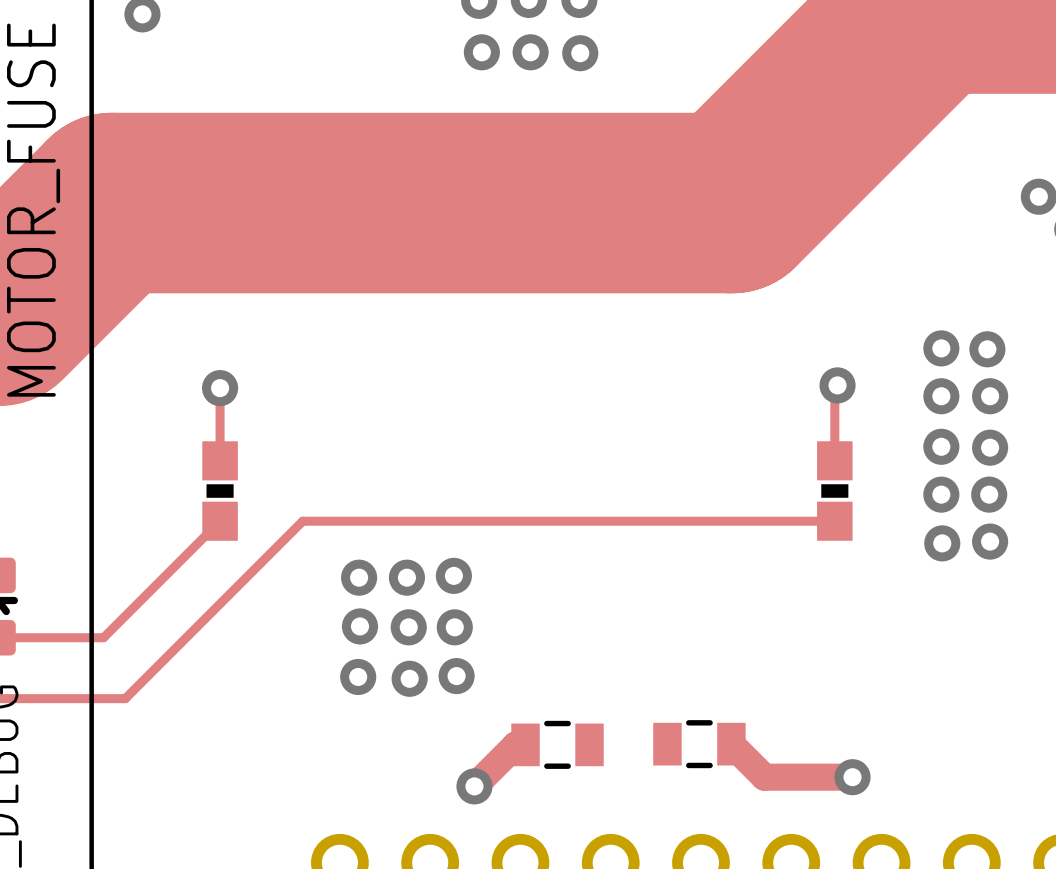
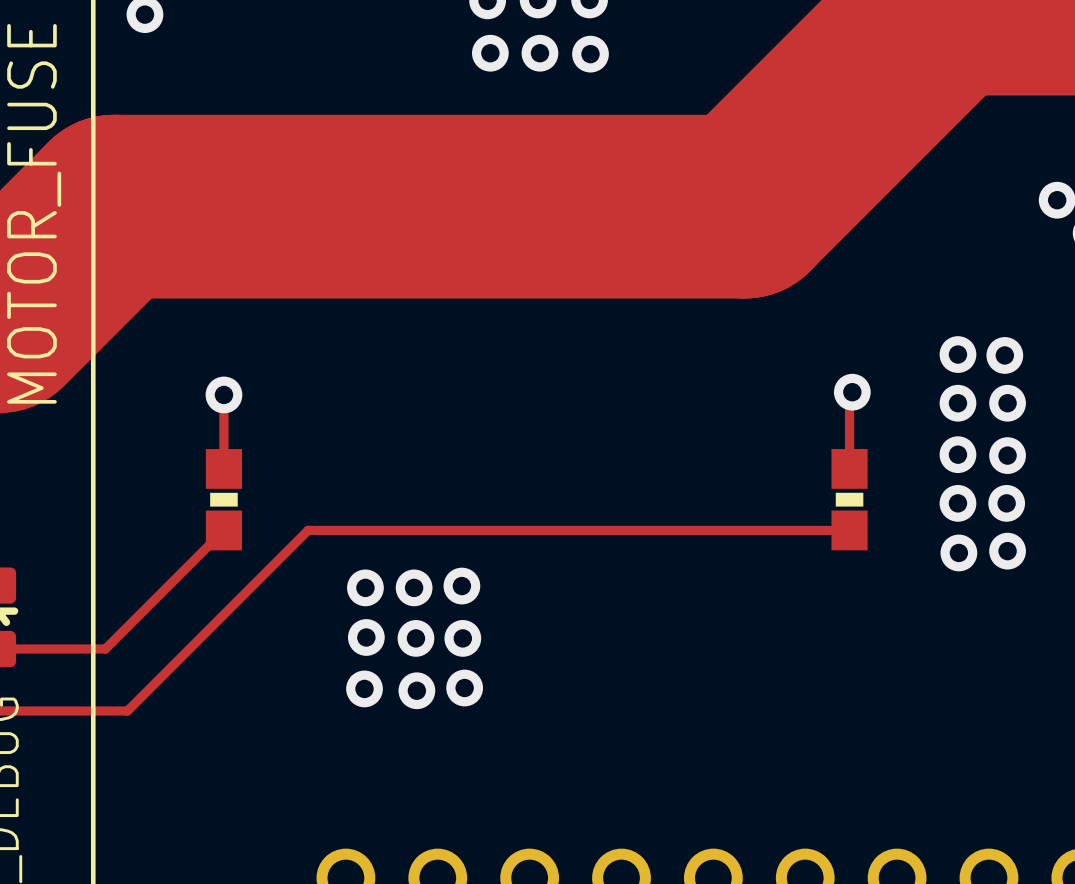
track: (525, 744) (515, 744) (474, 786) -> none
part: (557, 744) -> none
part: (699, 744) -> none
track: (731, 744) (764, 777) (852, 777) -> none
via: (852, 777) -> none
via: (474, 786) -> none

